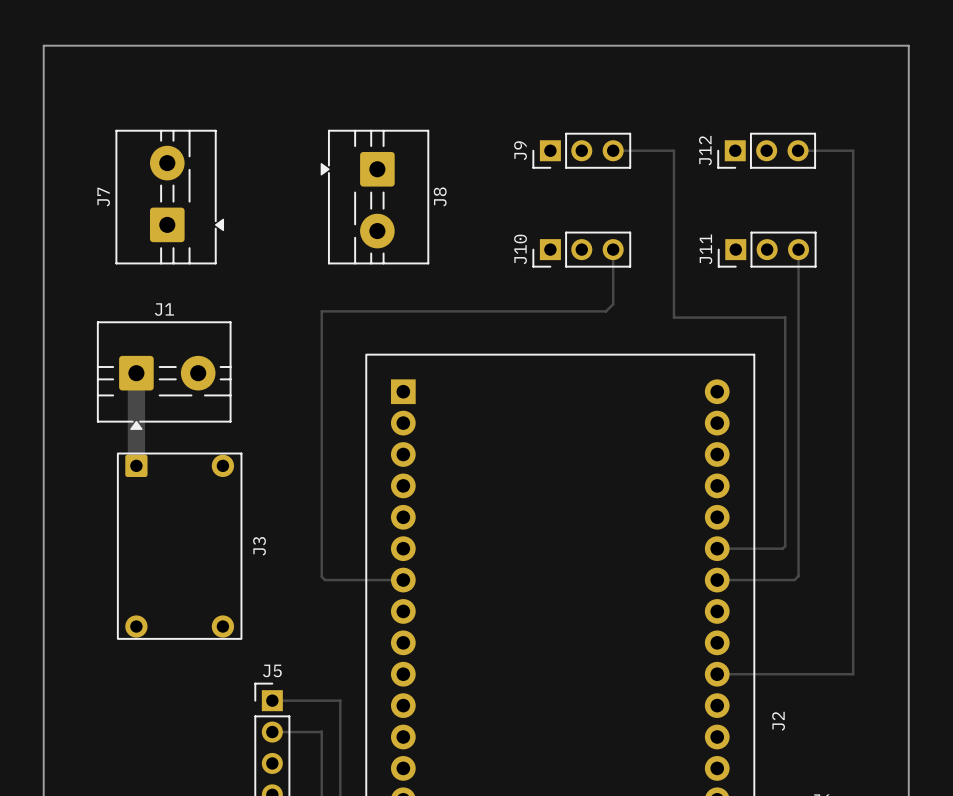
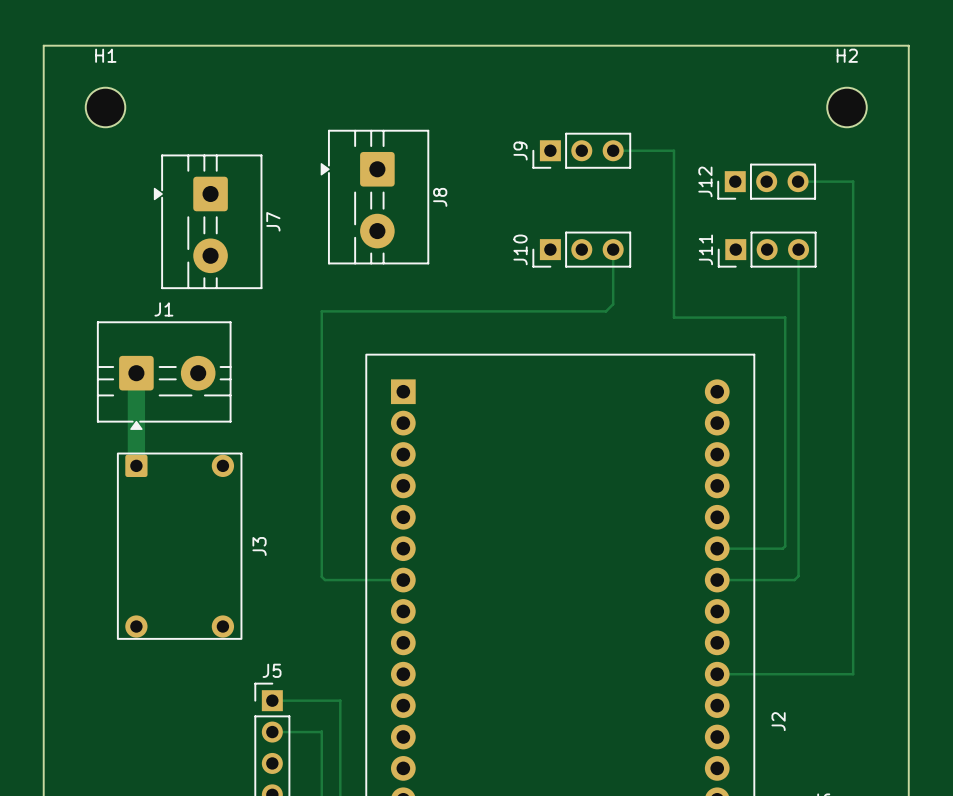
H1: none -> (105, 107)
H2: none -> (846, 107)
J12 position: (766, 150) -> (766, 181)
track: (798, 150) (853, 150) (853, 181) -> (798, 181) (853, 181)
J7 rotation: 0° (169, 197) -> 180° (208, 221)

